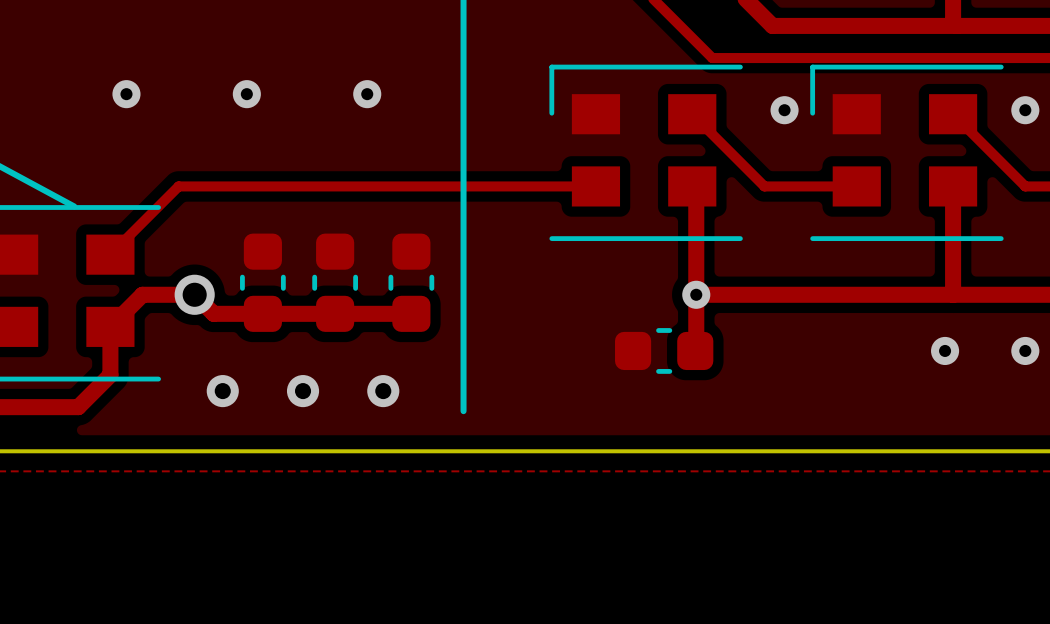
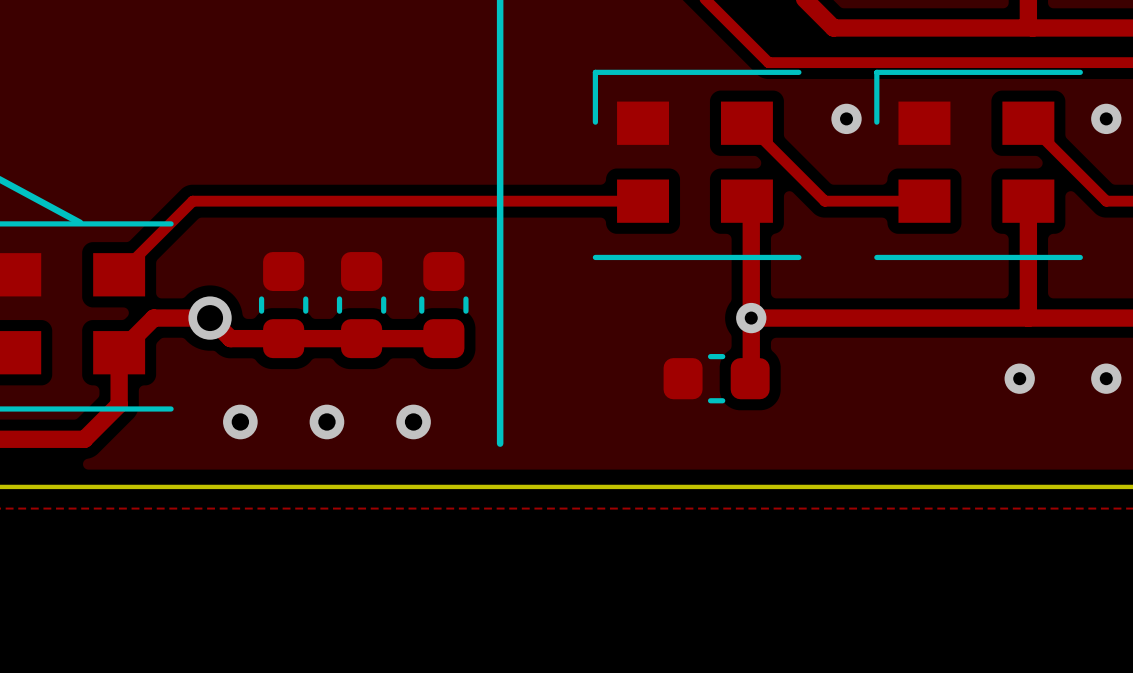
via: (126, 94) -> none
via: (246, 94) -> none
via: (367, 94) -> none

